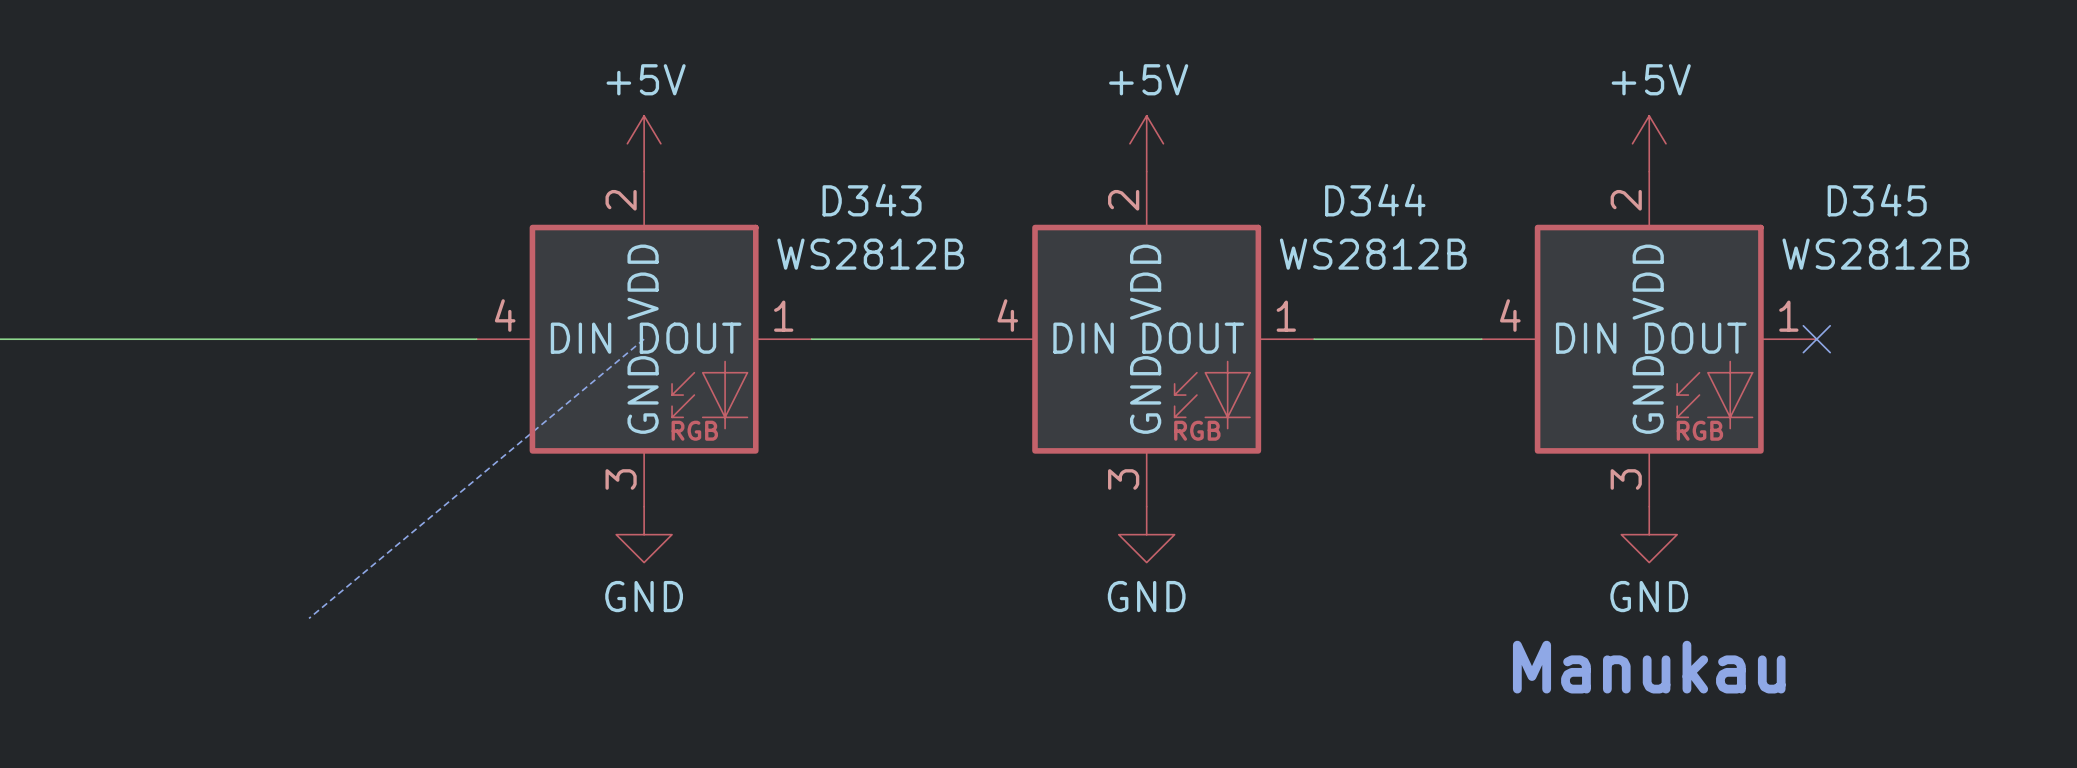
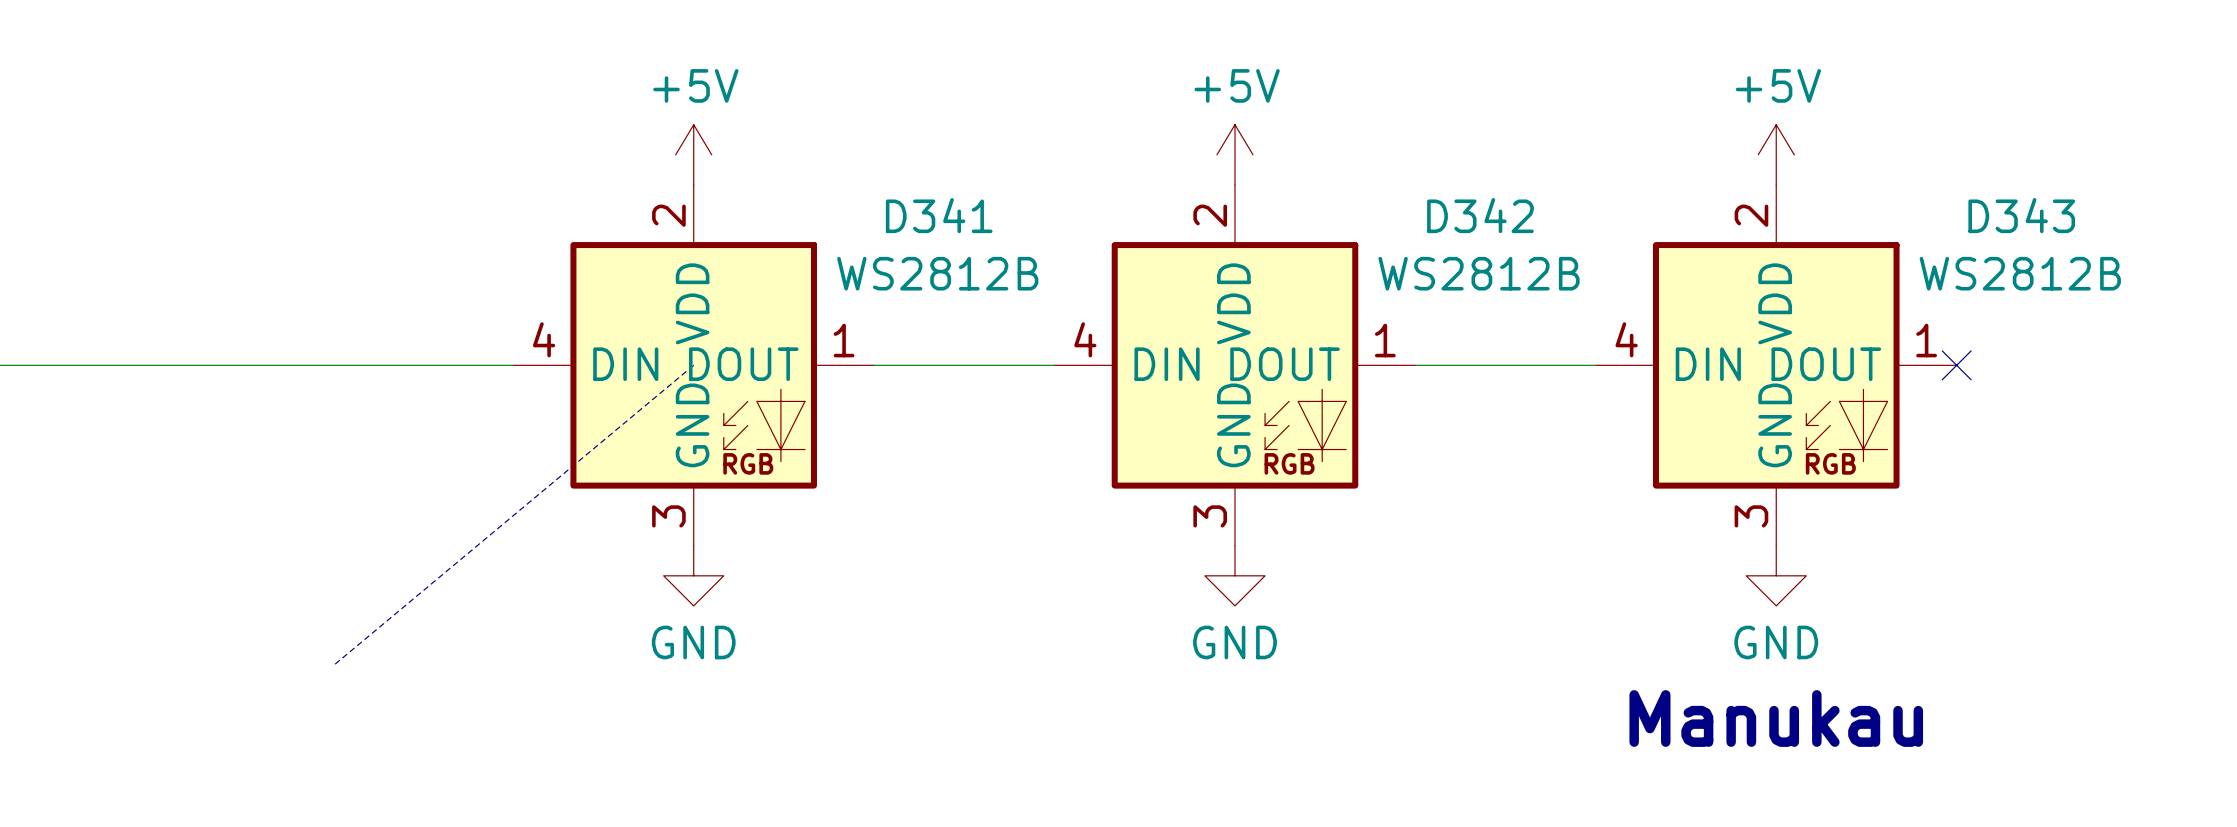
D343 name: D343 (872, 200) -> D341 (939, 215)
D344 name: D344 (1375, 200) -> D342 (1480, 215)
D345 name: D345 (1877, 200) -> D343 (2021, 215)

